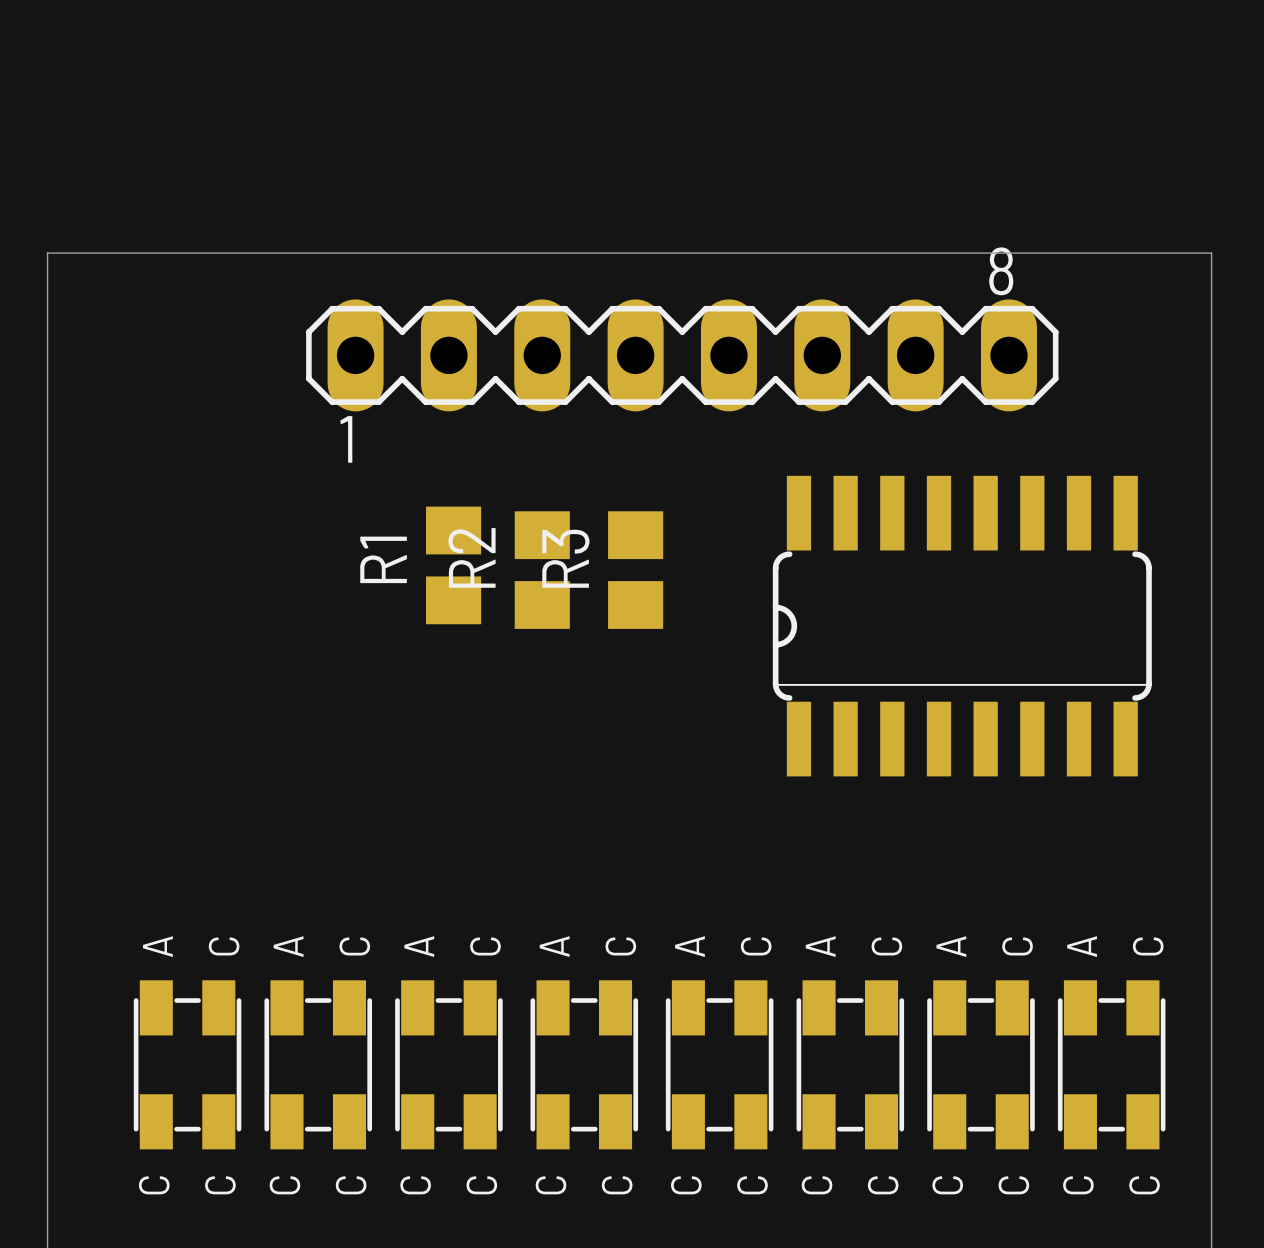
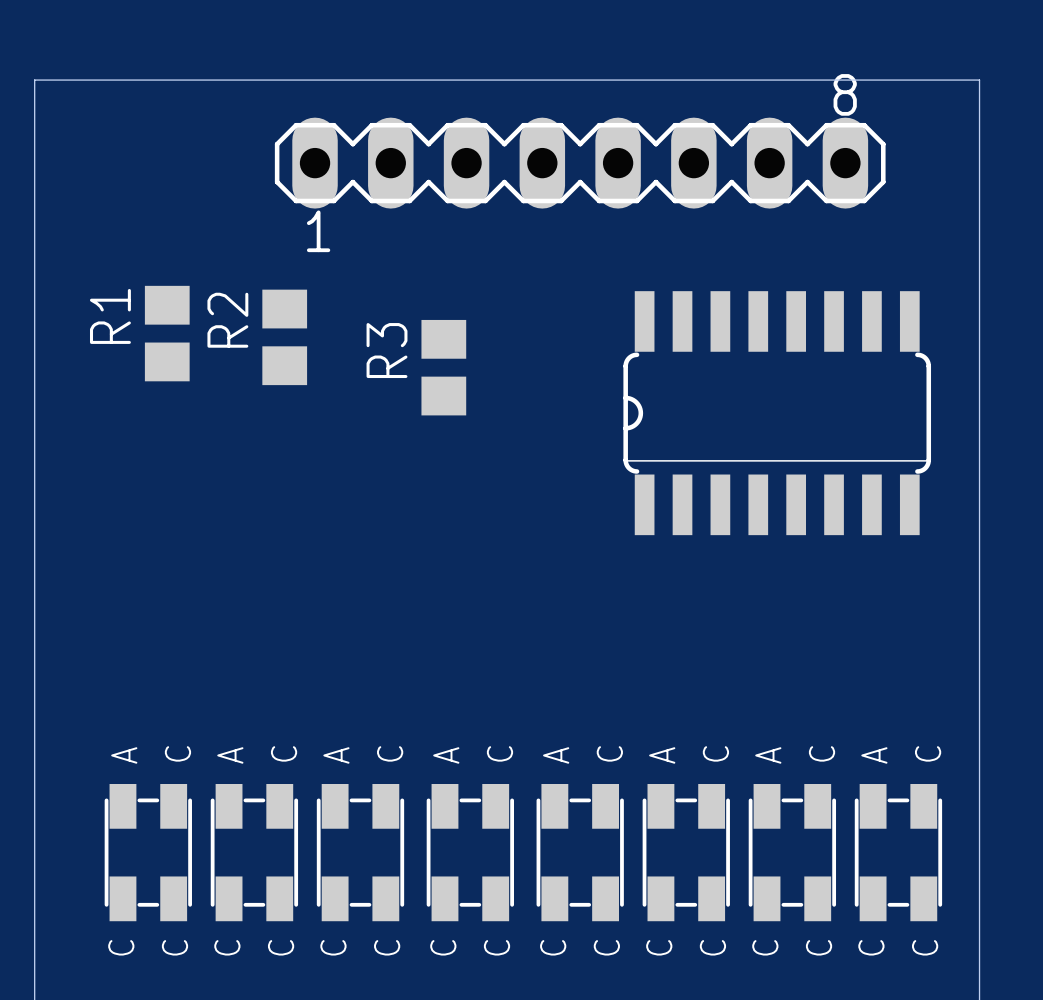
board edge: (47, 253) (1211, 253) -> (34, 193) (34, 80) (979, 80) (979, 193)
part position: (682, 355) -> (580, 163)
R1 position: (453, 565) -> (167, 333)
R2 position: (542, 570) -> (284, 337)
R3 position: (635, 570) -> (443, 367)
part position: (962, 626) -> (777, 413)

